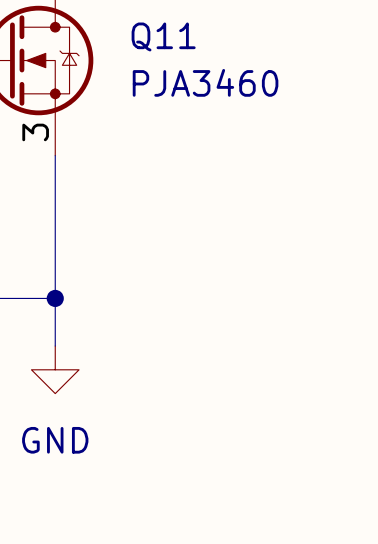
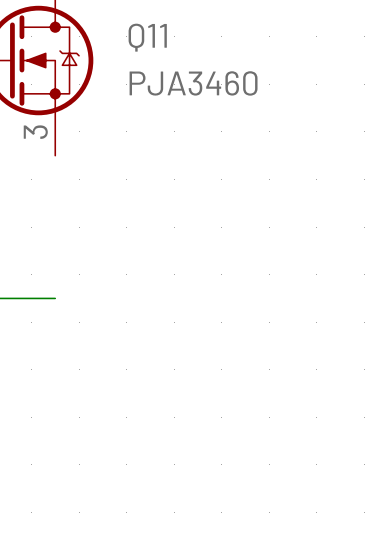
wire: (55, 155) (55, 346) -> none
junction: (55, 298) -> none
power symbol: GND (55, 369) -> none

